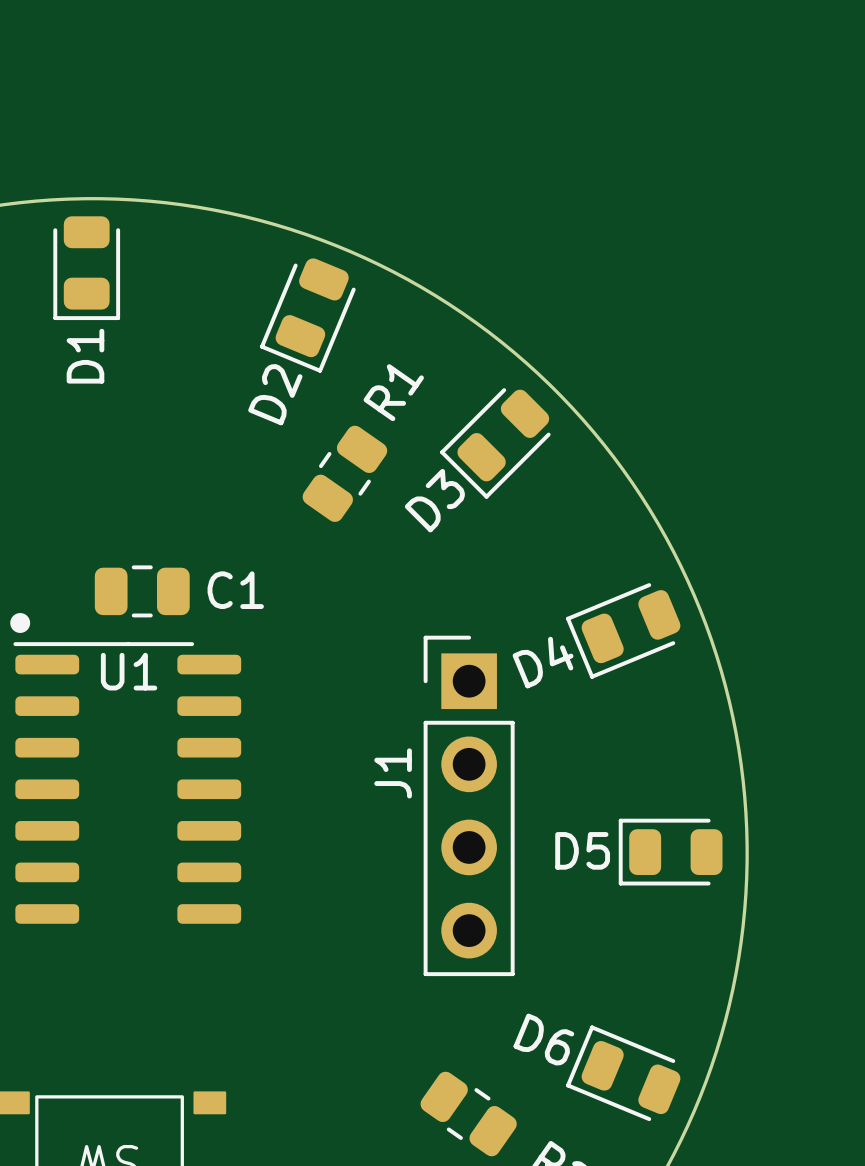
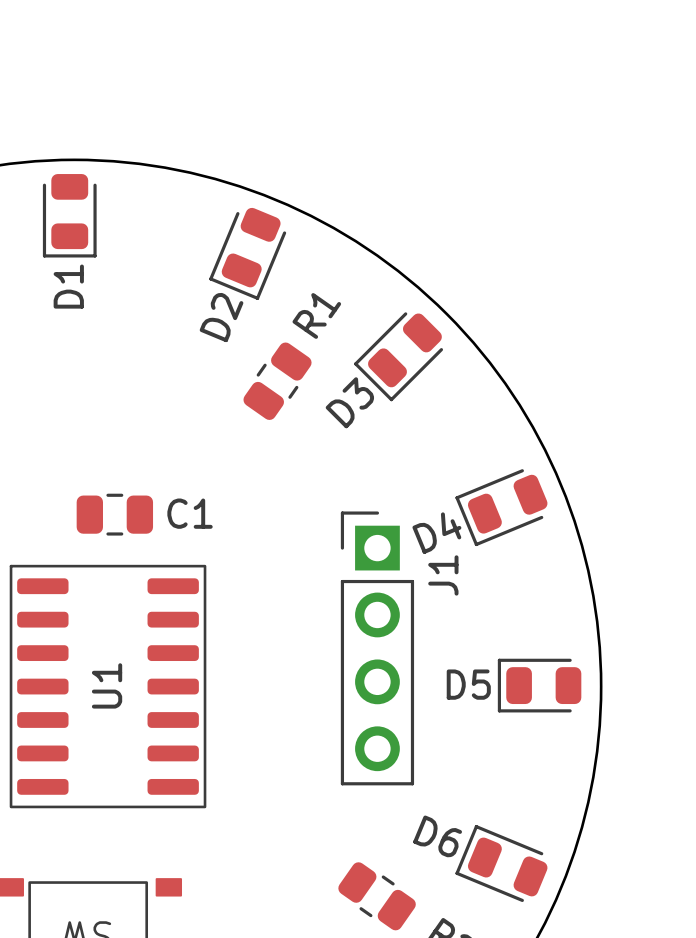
C1 position: (142, 591) -> (114, 514)
U1 footprint: [10, 613, 242, 924] -> [9, 564, 207, 809]
U1 name position: U1 (129, 671) -> U1 (107, 685)
J1 name position: J1 (393, 773) -> J1 (443, 575)

